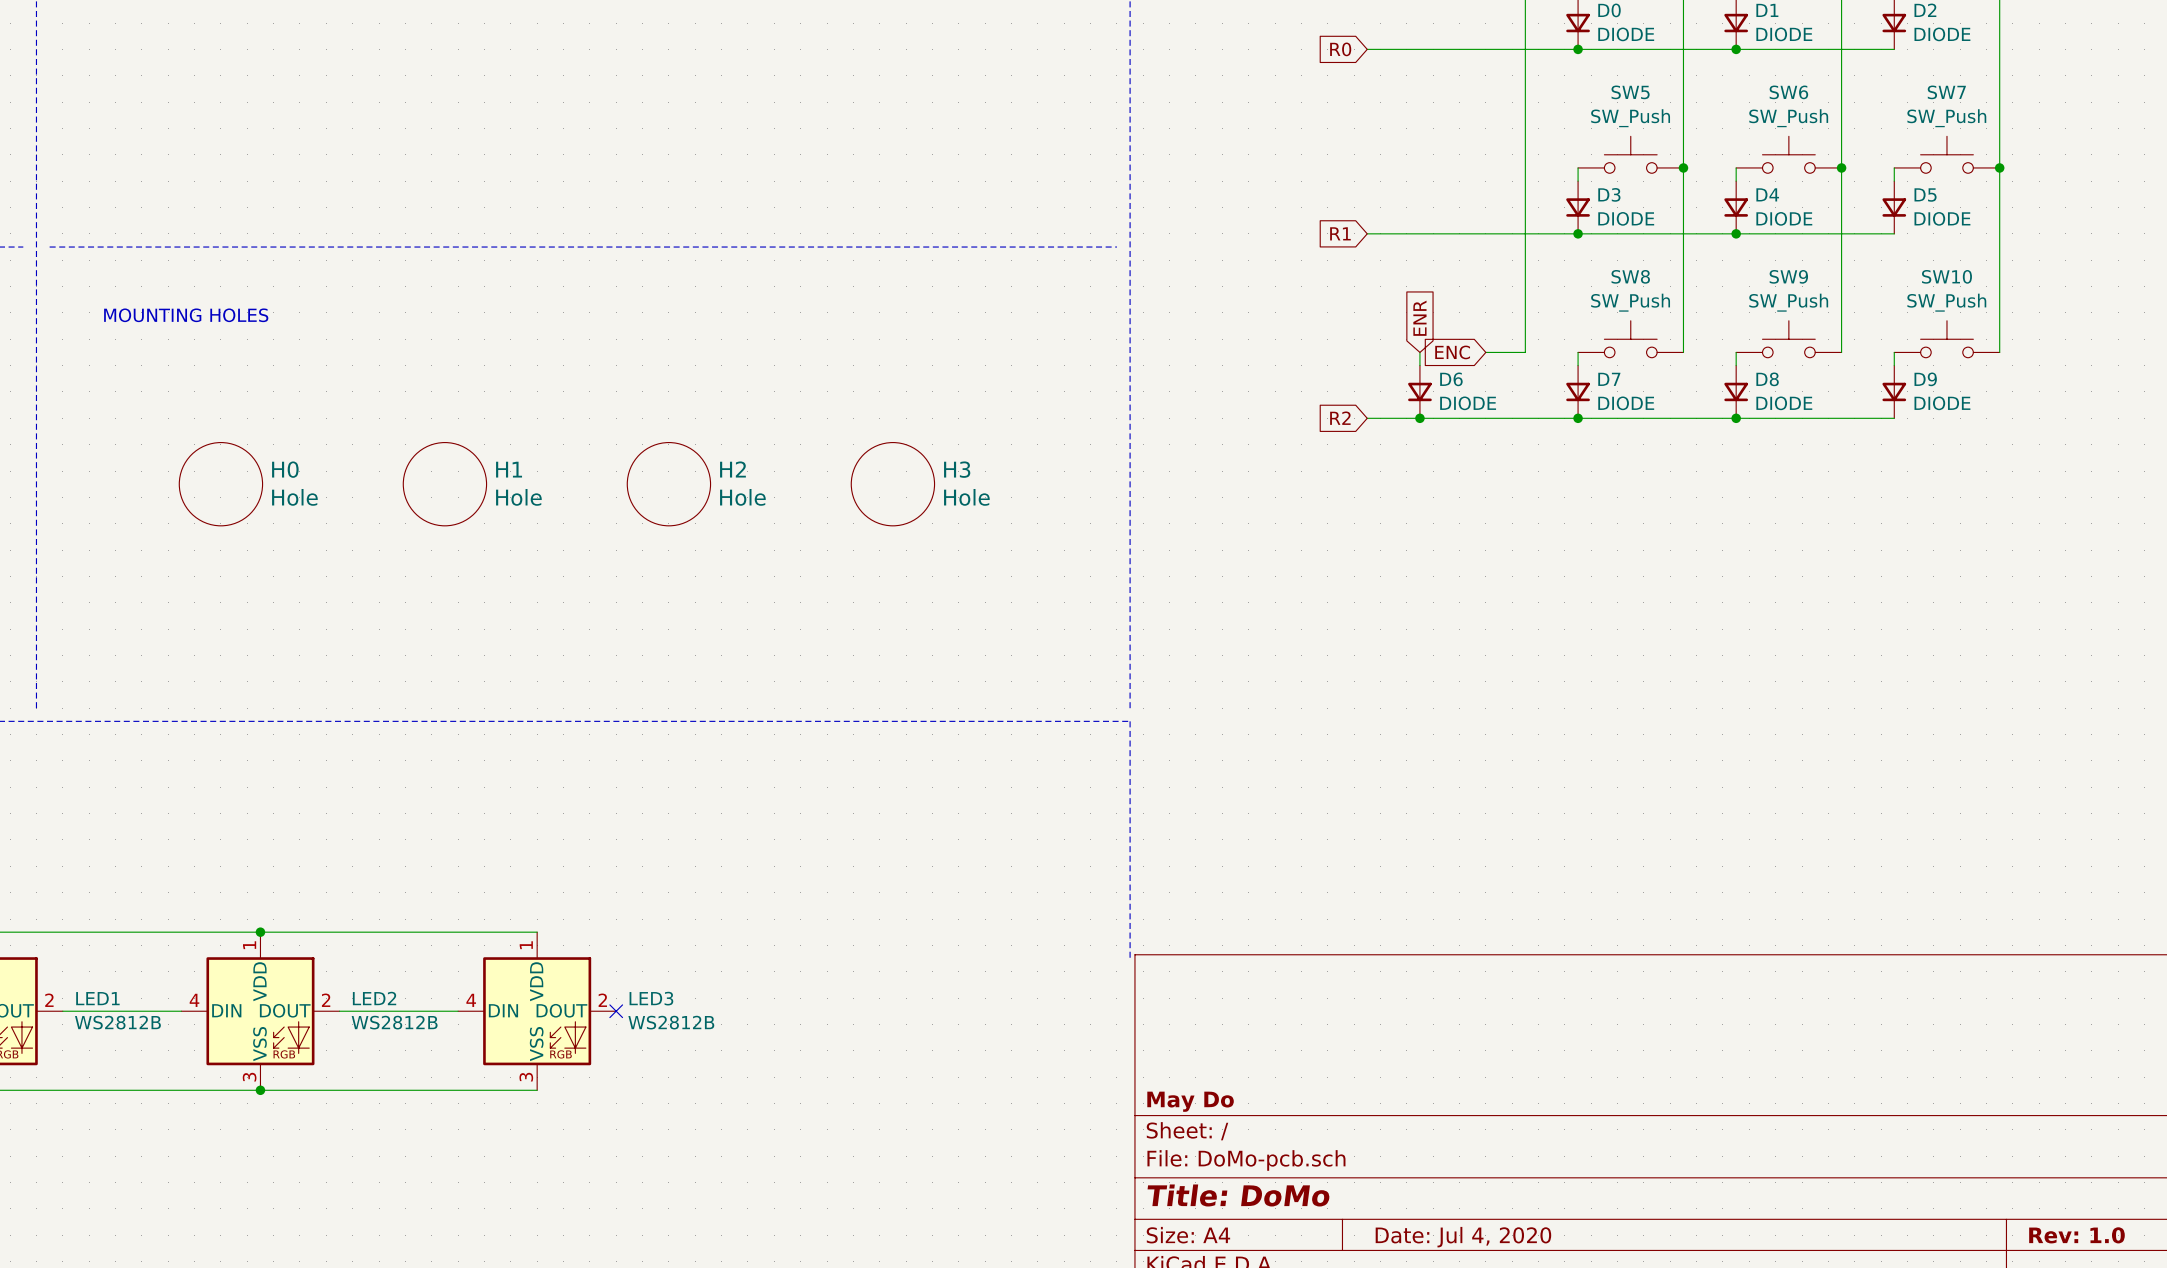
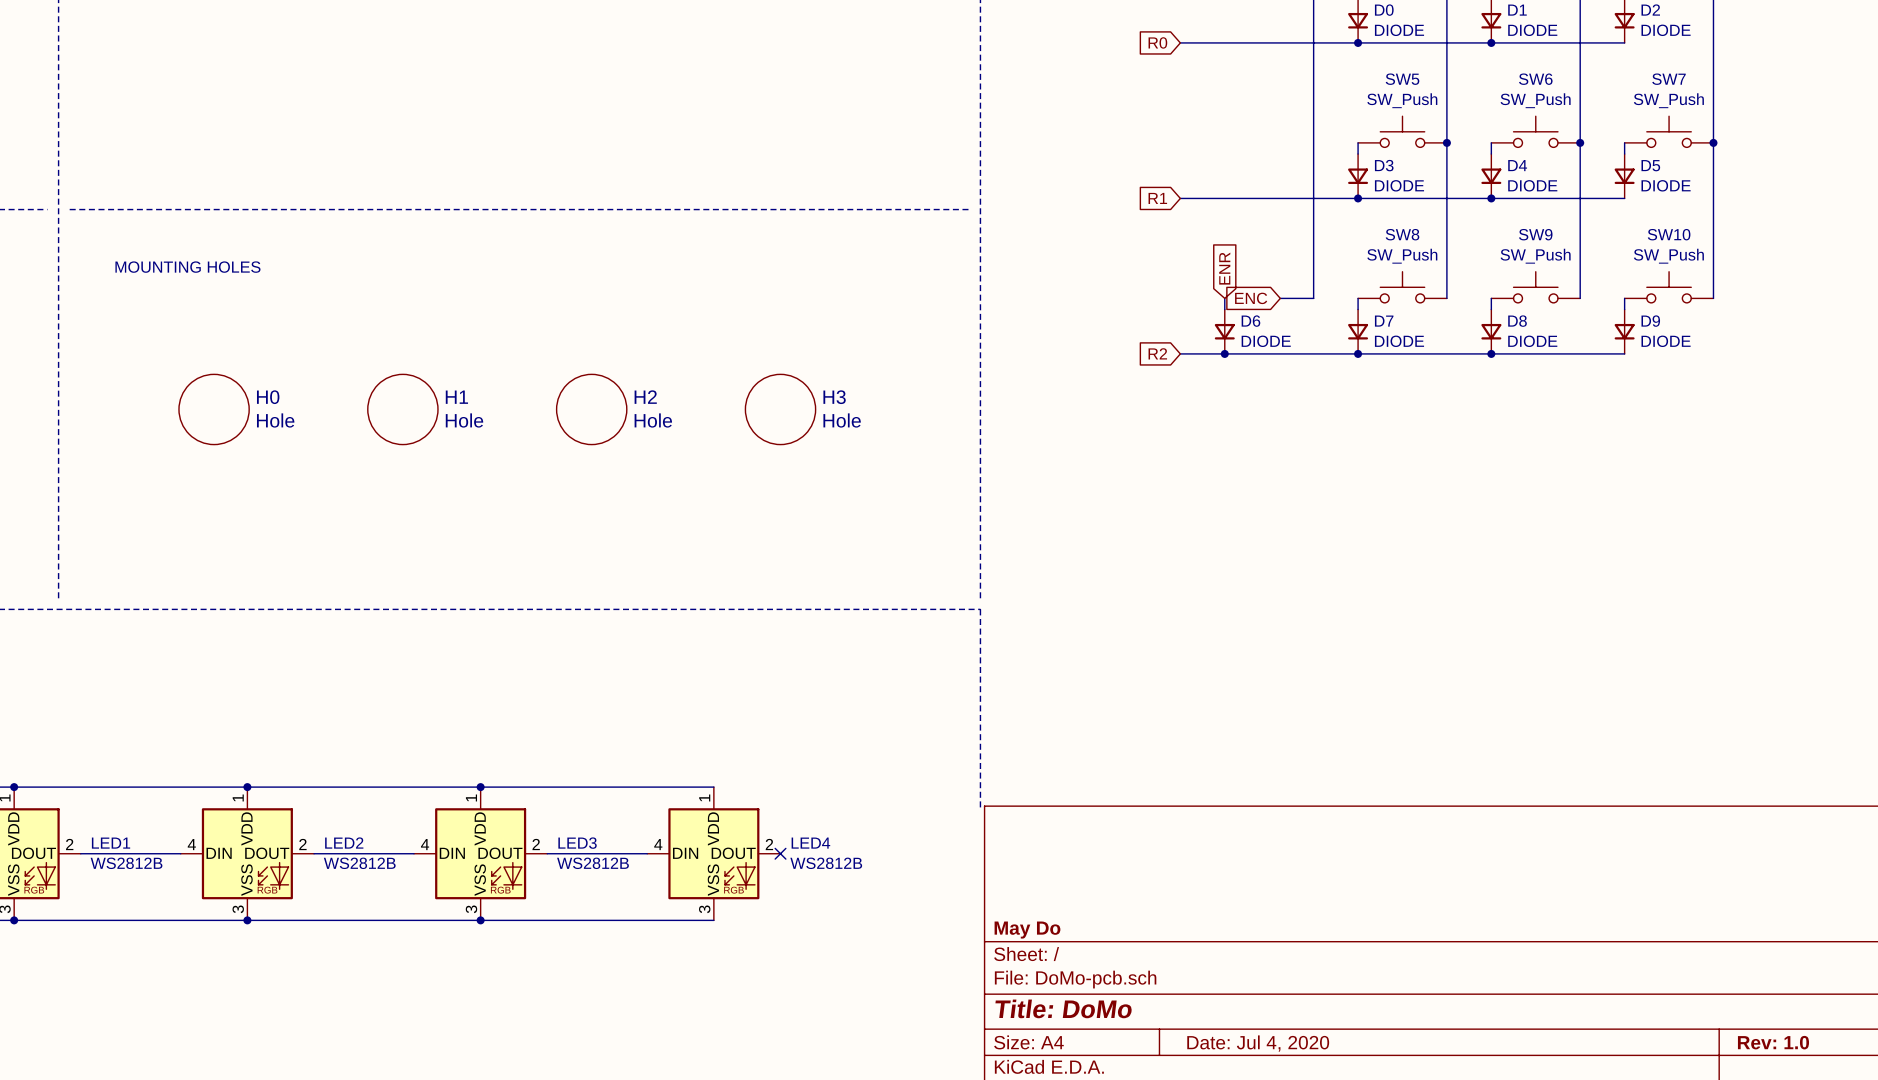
wire: none -> (480, 787) (713, 787)
junction: none -> (480, 787)
wire: none -> (547, 853) (647, 853)
no-connect mark: (616, 1011) -> none
LED4: none -> WS2812B (713, 853)
no-connect mark: none -> (780, 853)
wire: none -> (480, 920) (713, 920)
junction: none -> (480, 920)

